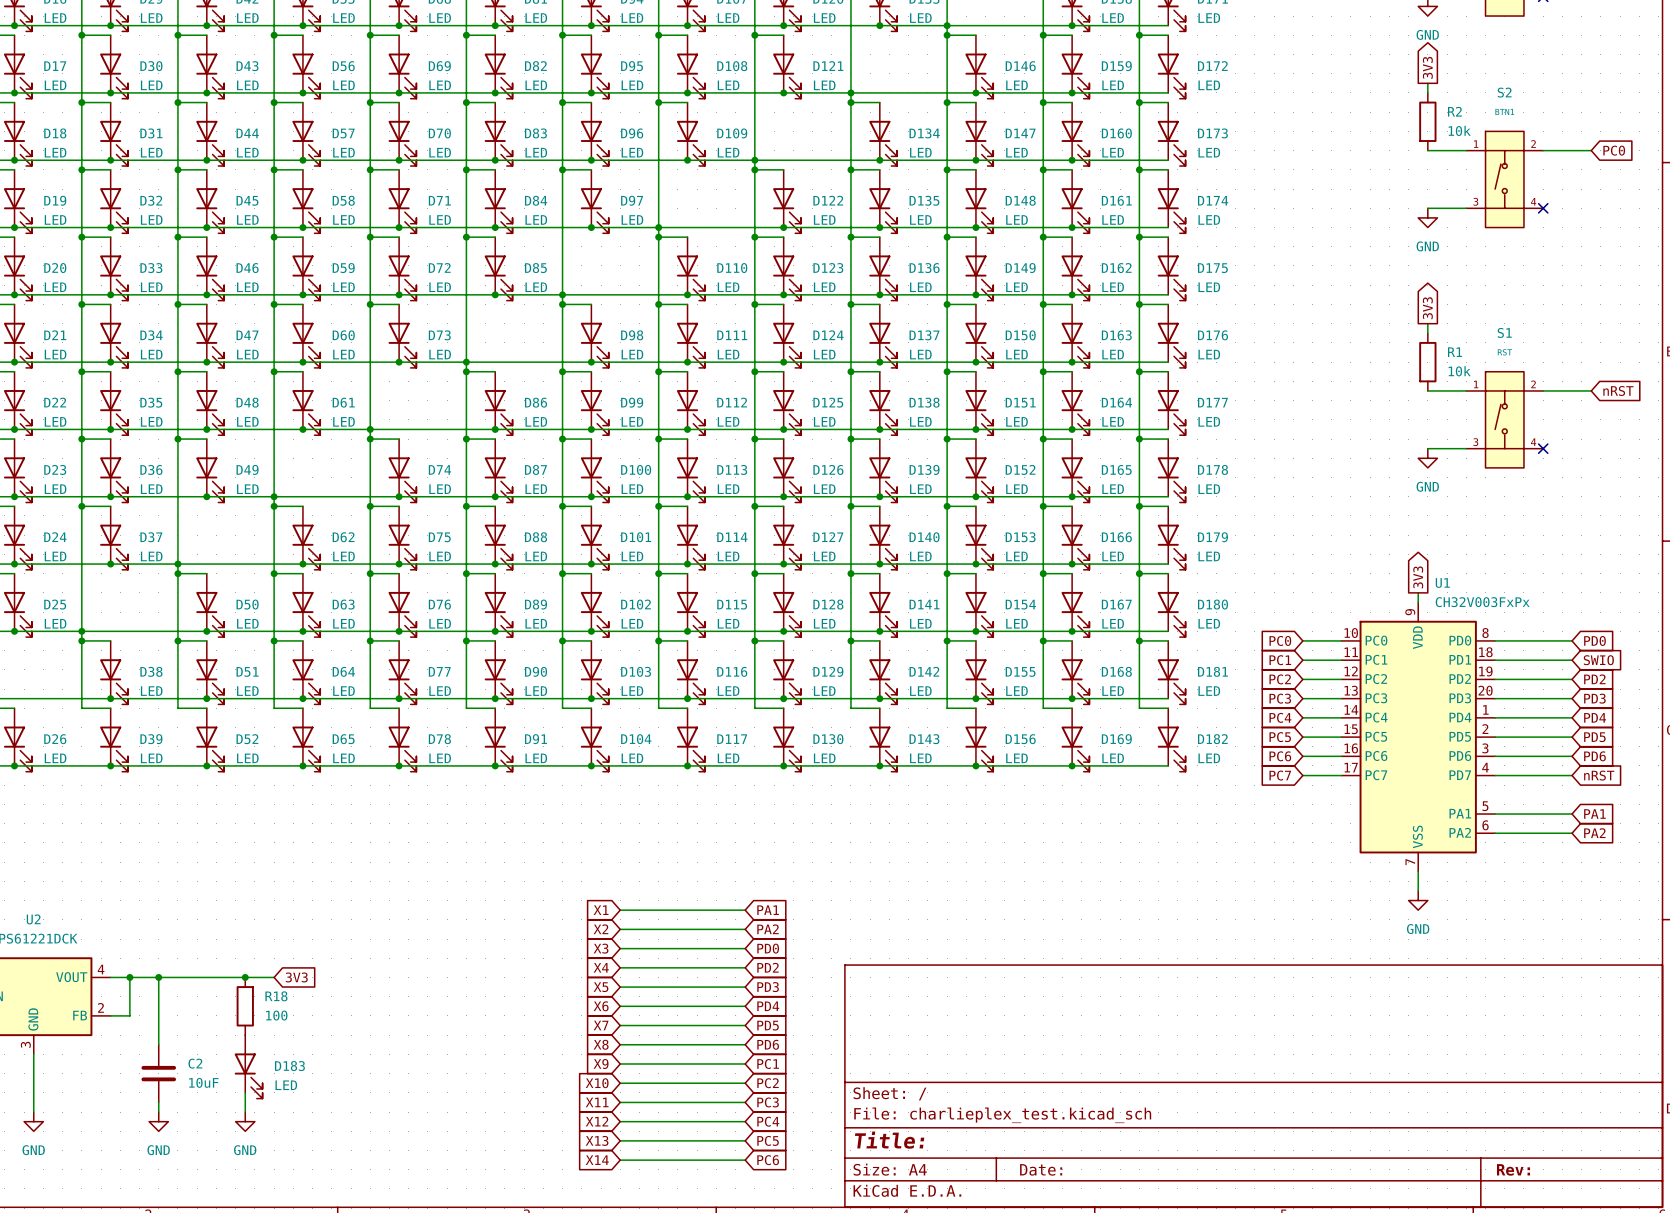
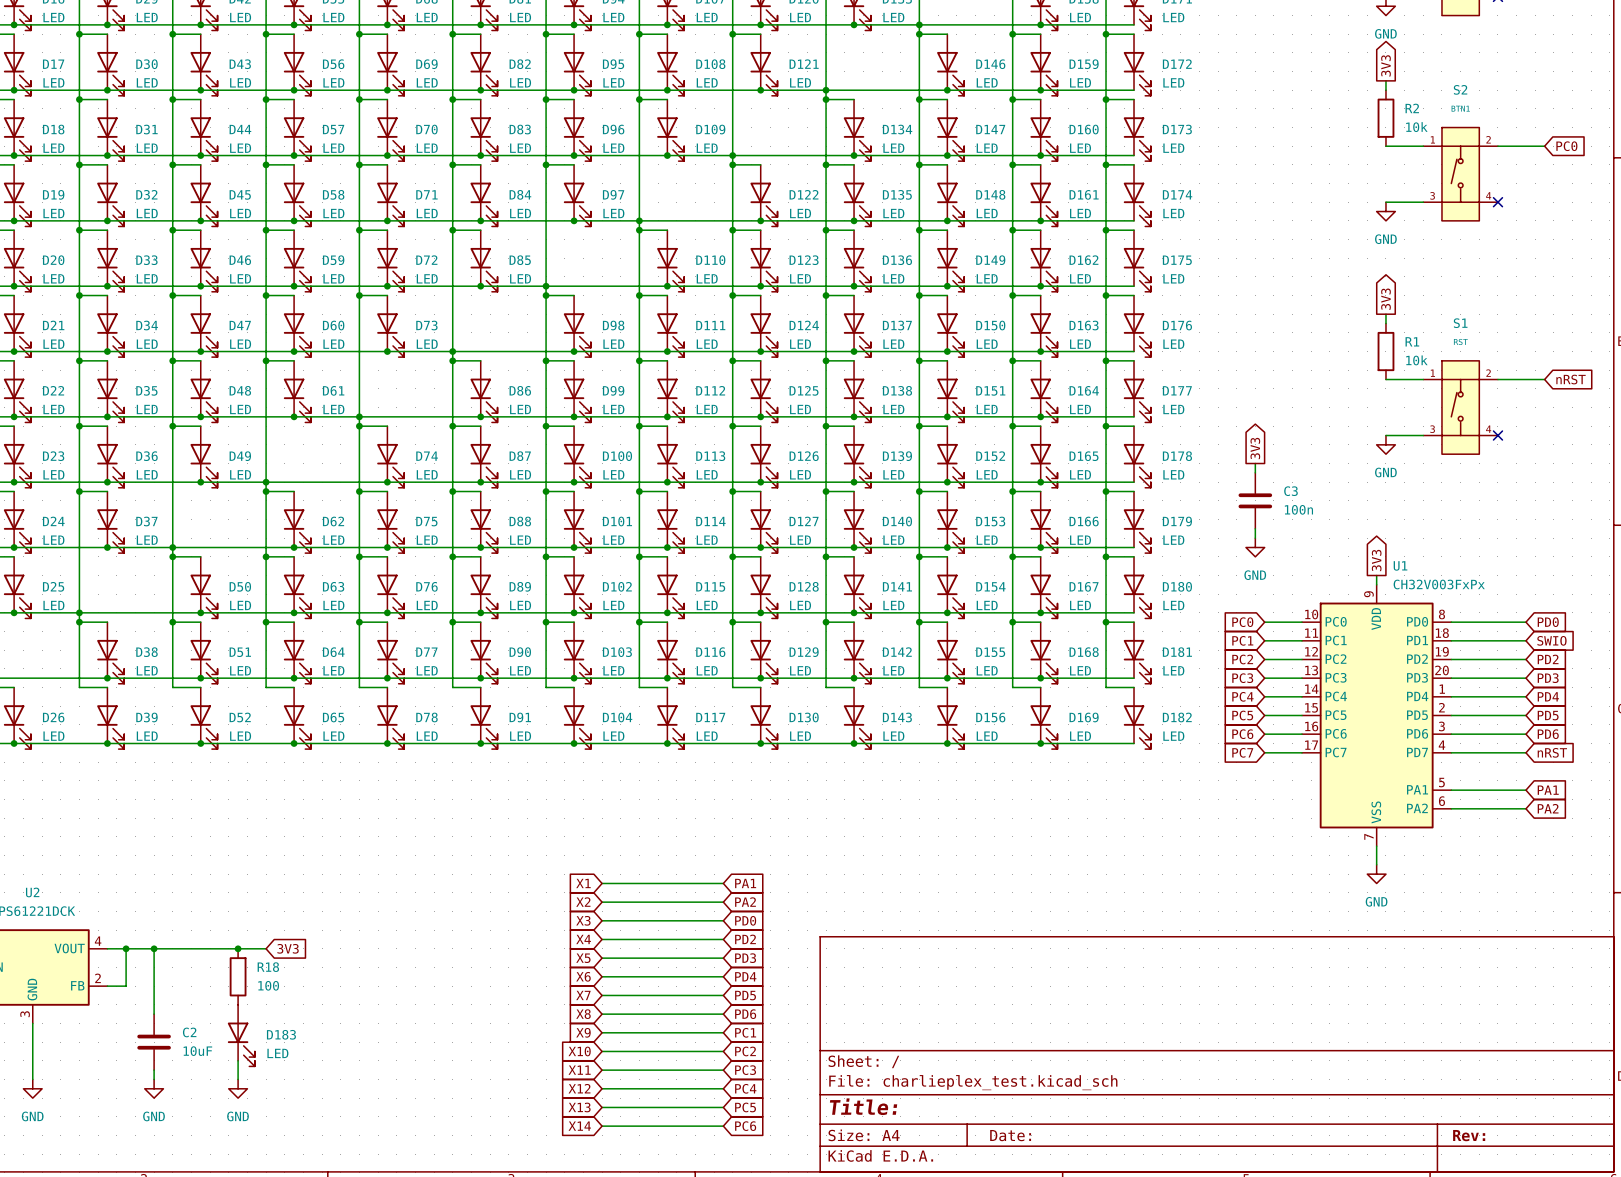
global label: none -> 3V3 (1255, 448)
wire: none -> (1255, 463) (1255, 472)
C3: none -> 100n (1255, 500)
wire: none -> (1255, 528) (1255, 538)
power symbol: none -> GND (1255, 547)

